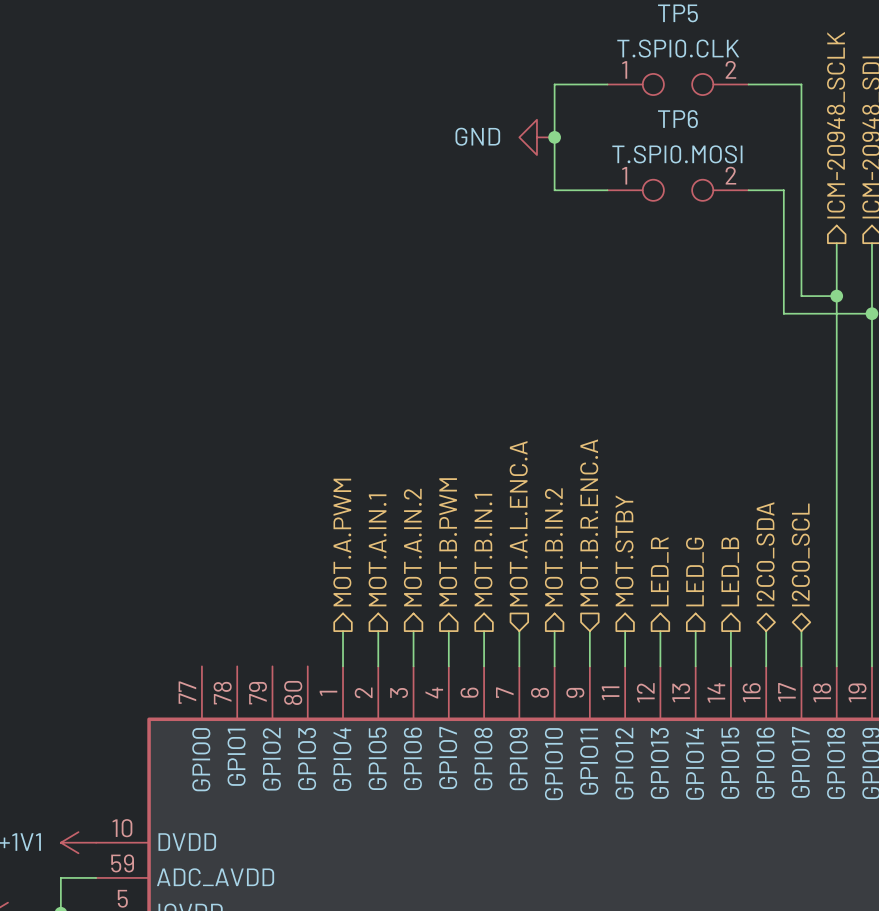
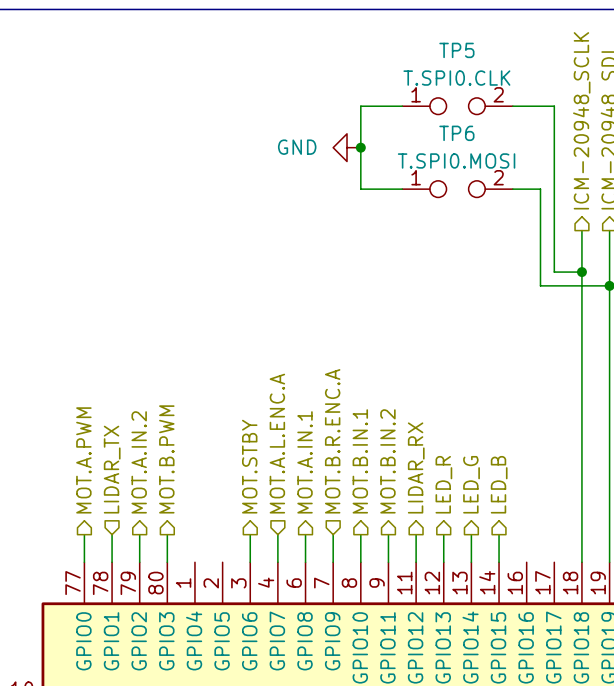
hierarchical label shape: input (589, 522) -> output (387, 461)
hierarchical label: MOT.B.R.ENC.A (589, 522) -> MOT.B.IN.2 (387, 461)
hierarchical label: MOT.A.L.ENC.A (518, 523) -> MOT.B.R.ENC.A (332, 441)
hierarchical label: none -> MOT.B.PWM (166, 459)
hierarchical label position: MOT.A.PWM (342, 542) -> MOT.A.PWM (83, 460)
hierarchical label shape: output (448, 542) -> input (277, 443)
hierarchical label: MOT.B.PWM (448, 542) -> MOT.A.L.ENC.A (277, 443)
hierarchical label: none -> MOT.A.IN.2 (139, 462)
hierarchical label: MOT.A.IN.2 (412, 547) -> MOT.STBY (249, 466)
hierarchical label: MOT.B.IN.2 (553, 547) -> MOT.B.IN.1 (360, 461)
hierarchical label: MOT.A.IN.1 (377, 550) -> none
hierarchical label: MOT.B.IN.1 (483, 550) -> MOT.A.IN.1 (305, 462)
hierarchical label: MOT.STBY (624, 550) -> LIDAR_RX (416, 467)
hierarchical label: none -> LIDAR_TX (112, 469)
hierarchical label: I2C0_SDA (765, 554) -> none
hierarchical label: I2C0_SCL (800, 554) -> none
wire: none -> (84, 534) (84, 562)
wire: none -> (112, 534) (112, 562)
wire: (343, 631) (343, 666) -> (139, 534) (139, 562)
wire: (378, 631) (378, 666) -> (167, 534) (167, 562)
wire: (766, 631) (766, 666) -> none
wire: (801, 631) (801, 666) -> none

